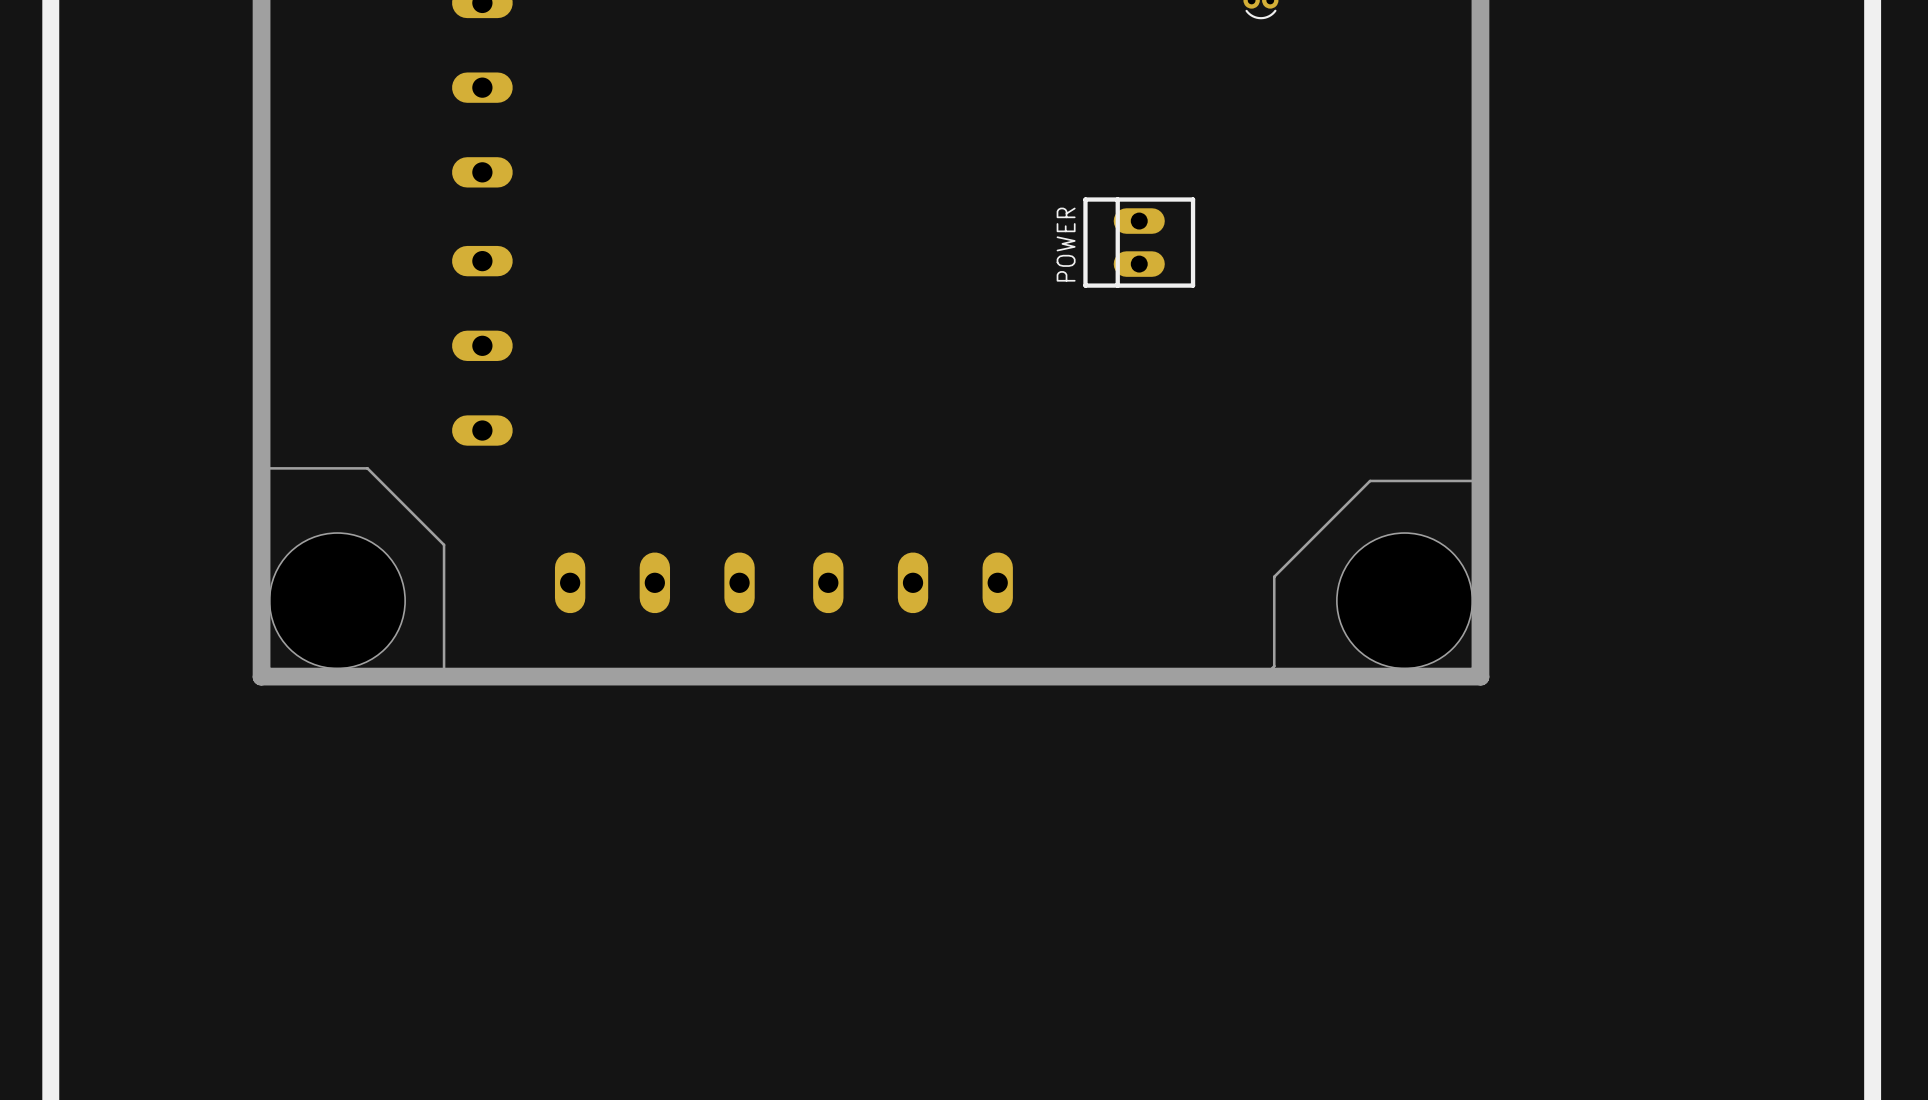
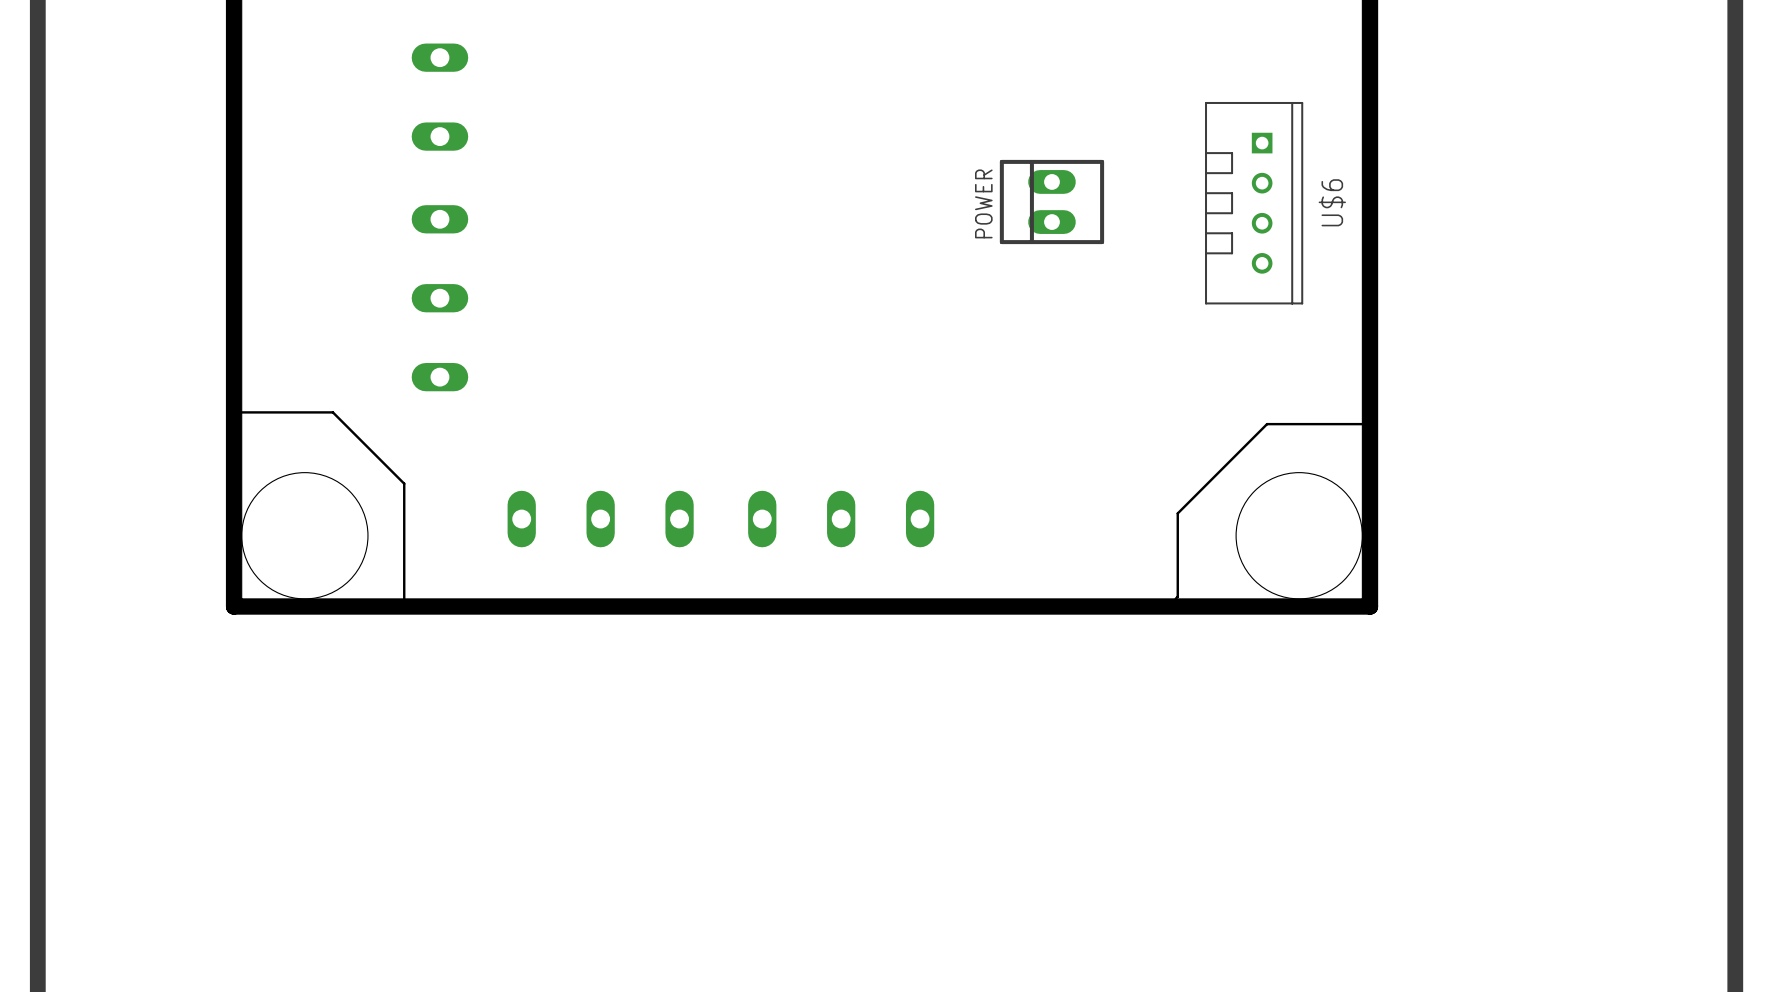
U$6: none -> (1254, 203)

